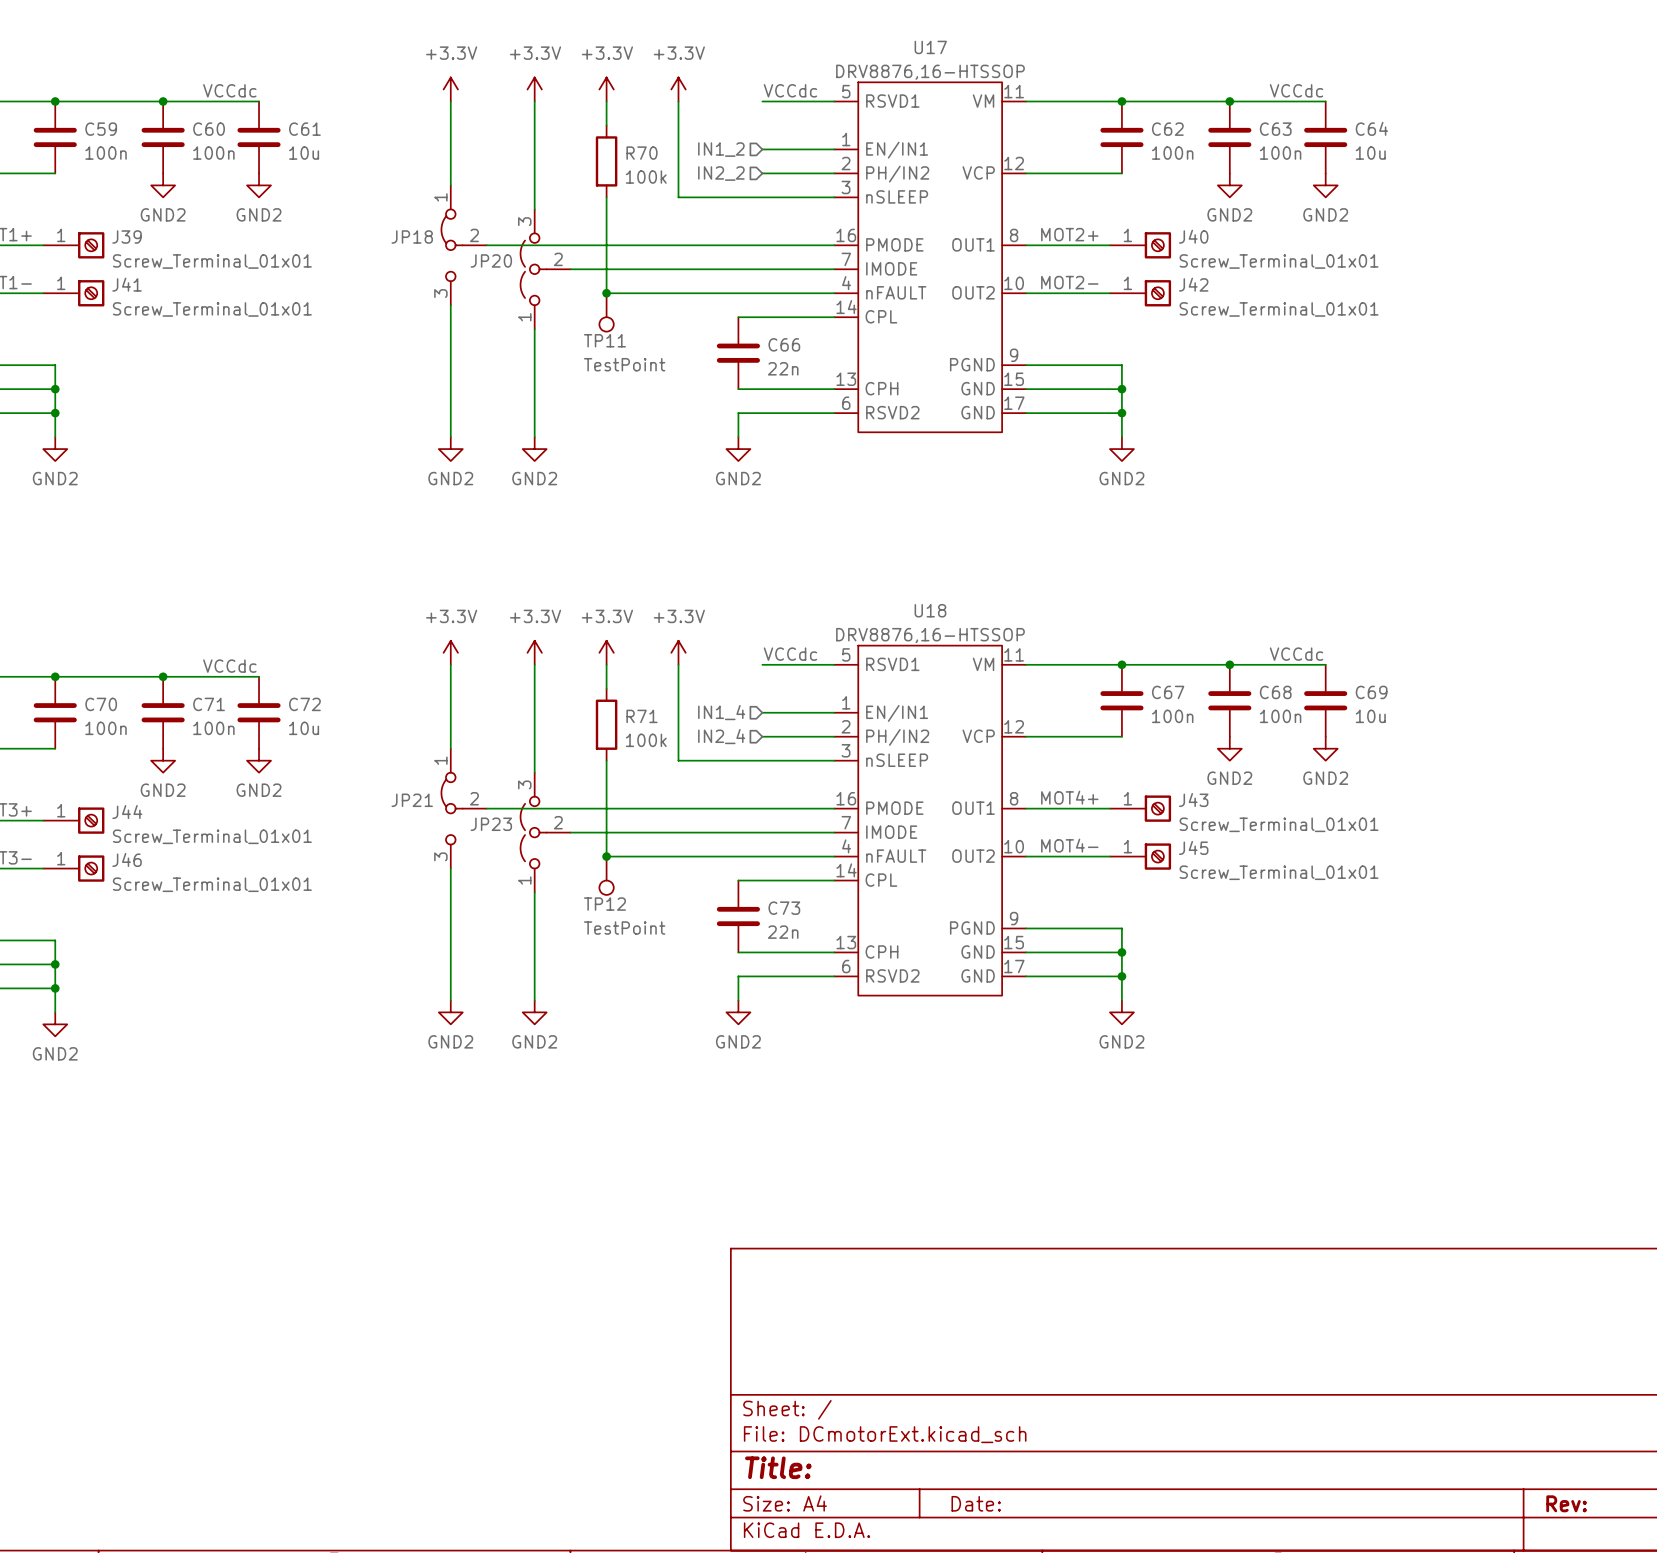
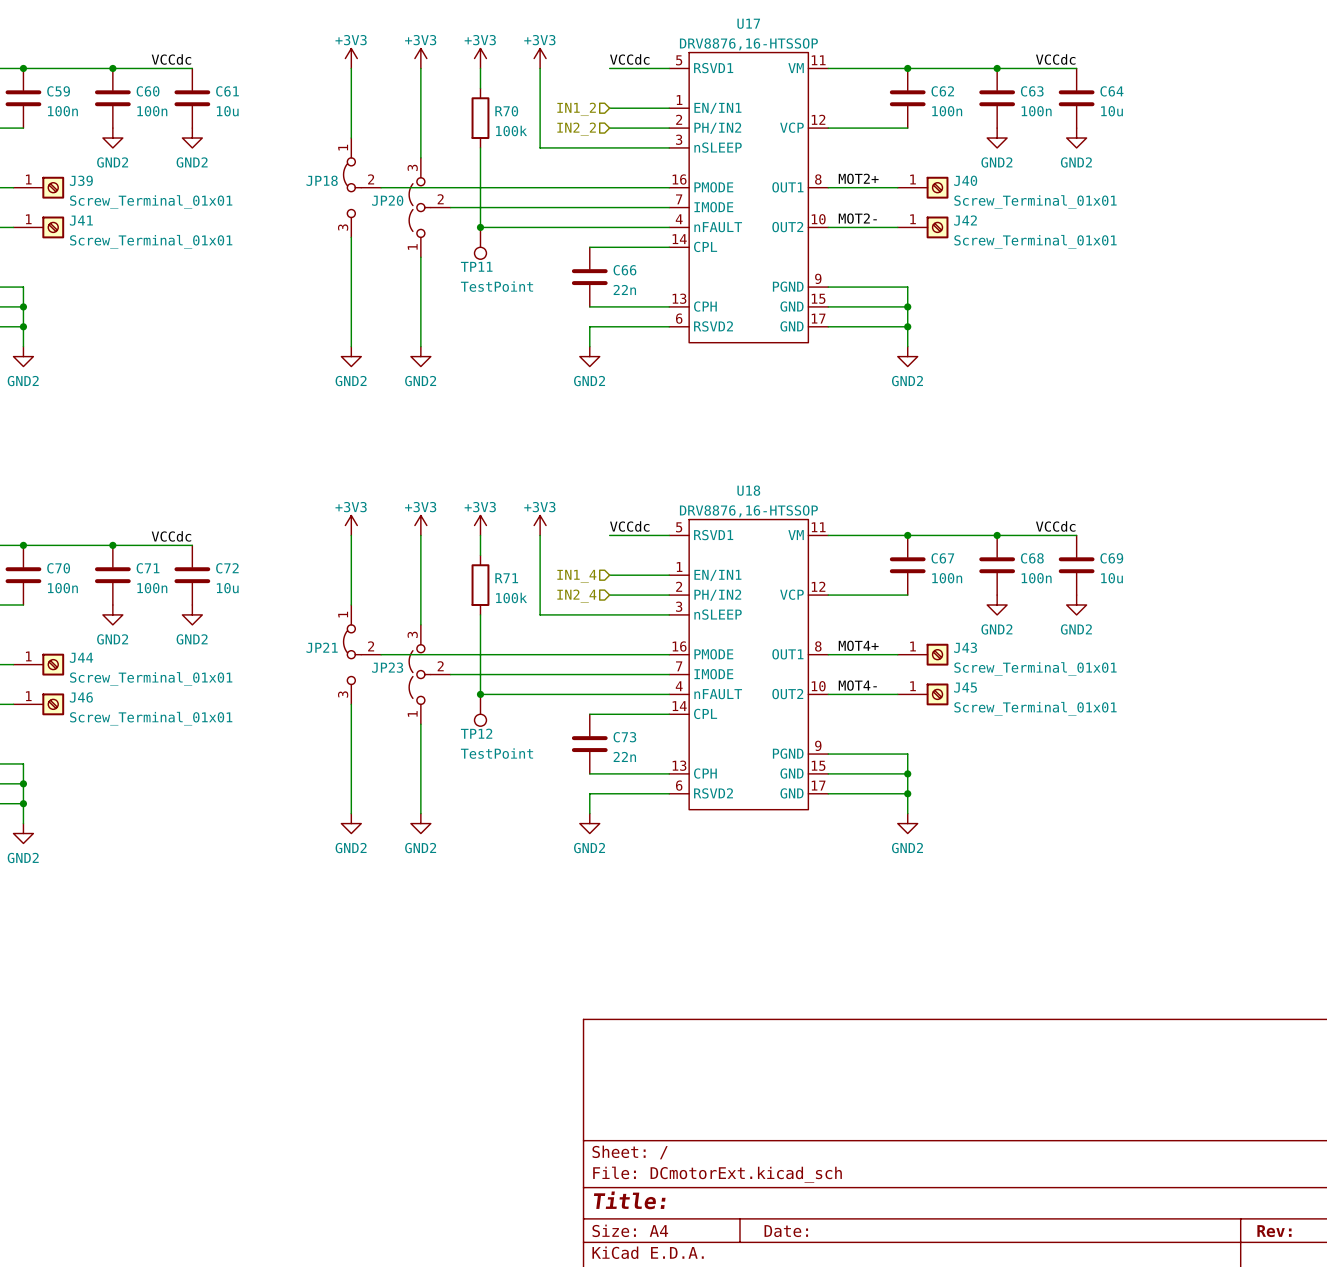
power symbol: +3.3V (450, 89) -> +3V3 (351, 58)
power symbol: +3.3V (534, 89) -> +3V3 (420, 58)
power symbol: +3.3V (606, 89) -> +3V3 (480, 58)
power symbol: +3.3V (678, 89) -> +3V3 (540, 58)
power symbol: +3.3V (450, 652) -> +3V3 (351, 525)
power symbol: +3.3V (534, 652) -> +3V3 (420, 525)
power symbol: +3.3V (606, 652) -> +3V3 (480, 525)
power symbol: +3.3V (678, 652) -> +3V3 (540, 525)

